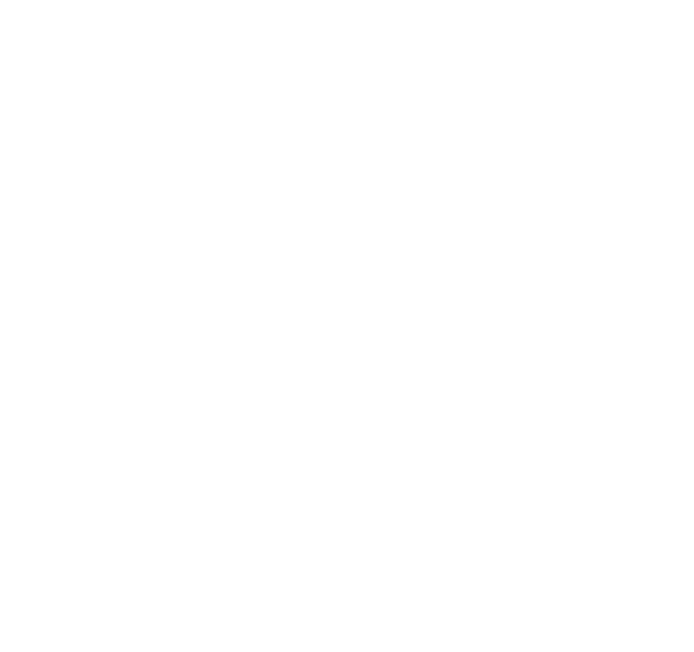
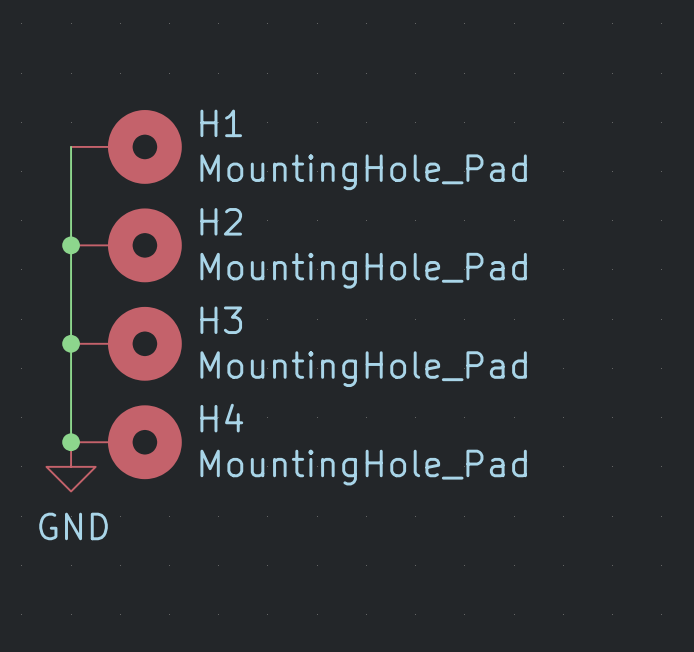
wire: none -> (71, 146) (71, 442)
H1: none -> MountingHole_Pad (126, 146)
junction: none -> (71, 245)
H2: none -> MountingHole_Pad (126, 245)
junction: none -> (71, 343)
H3: none -> MountingHole_Pad (126, 343)
junction: none -> (71, 442)
H4: none -> MountingHole_Pad (126, 442)
power symbol: none -> GND (71, 466)

